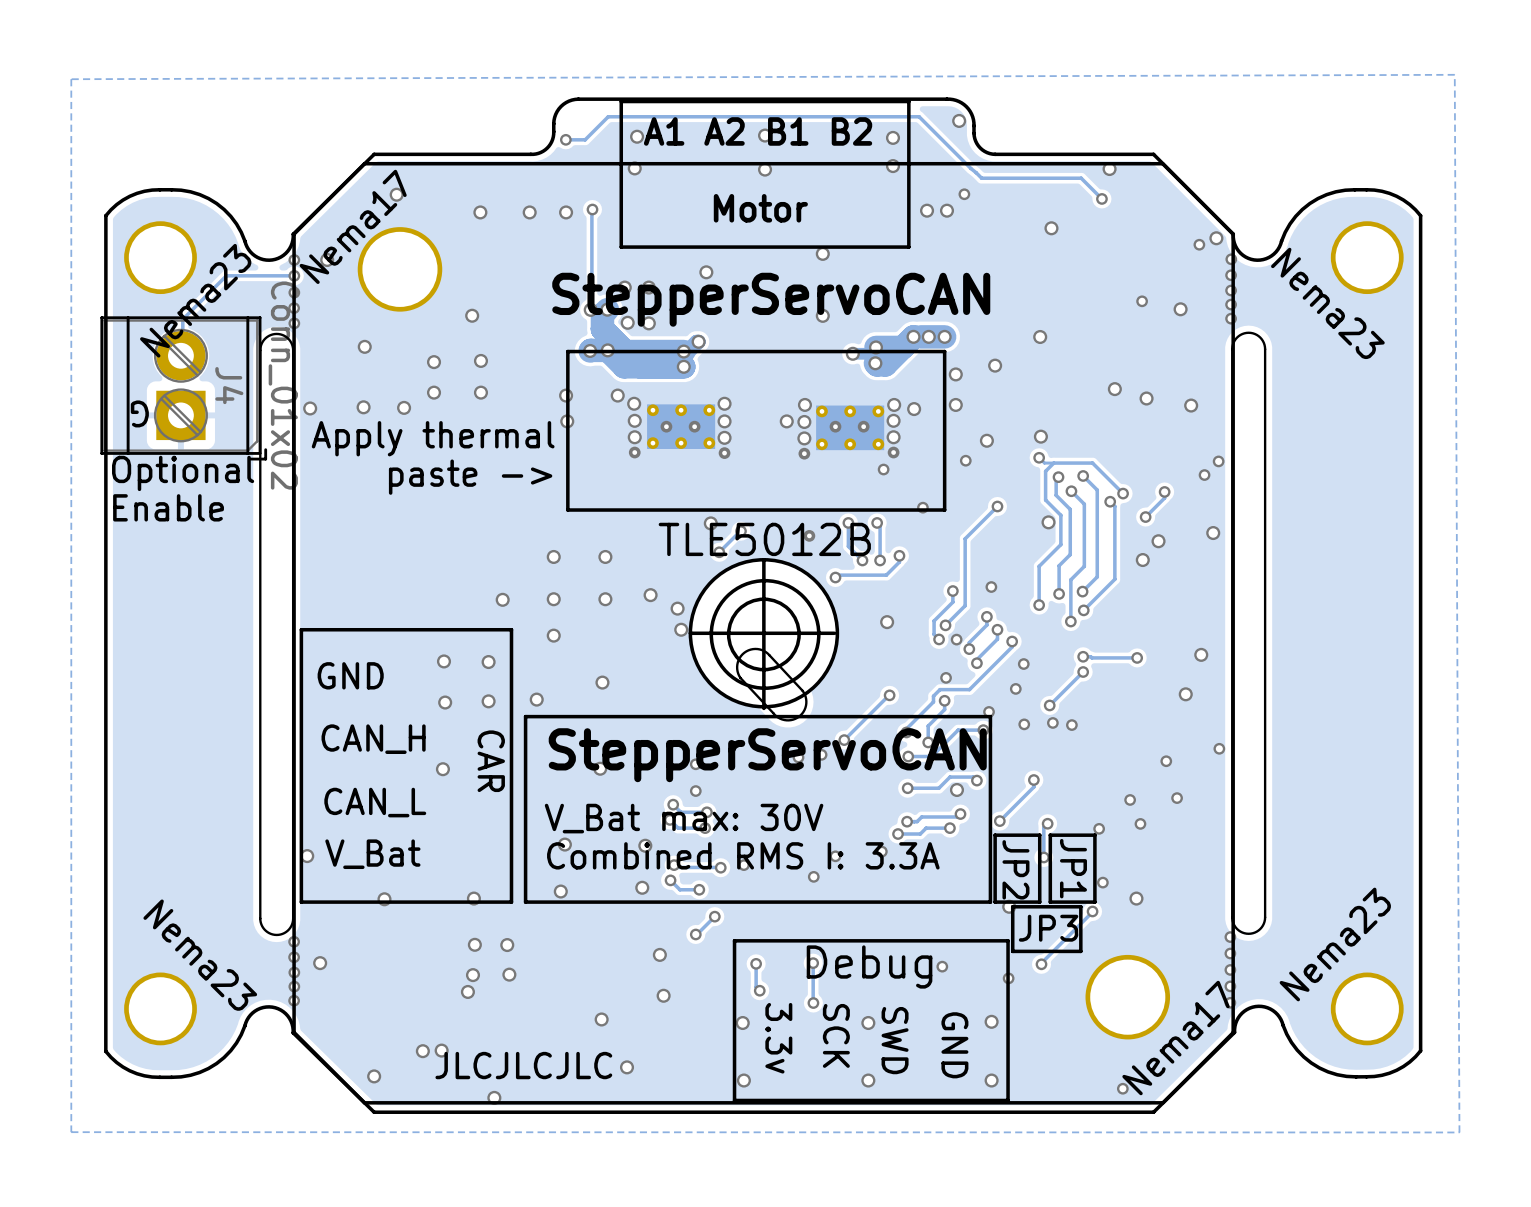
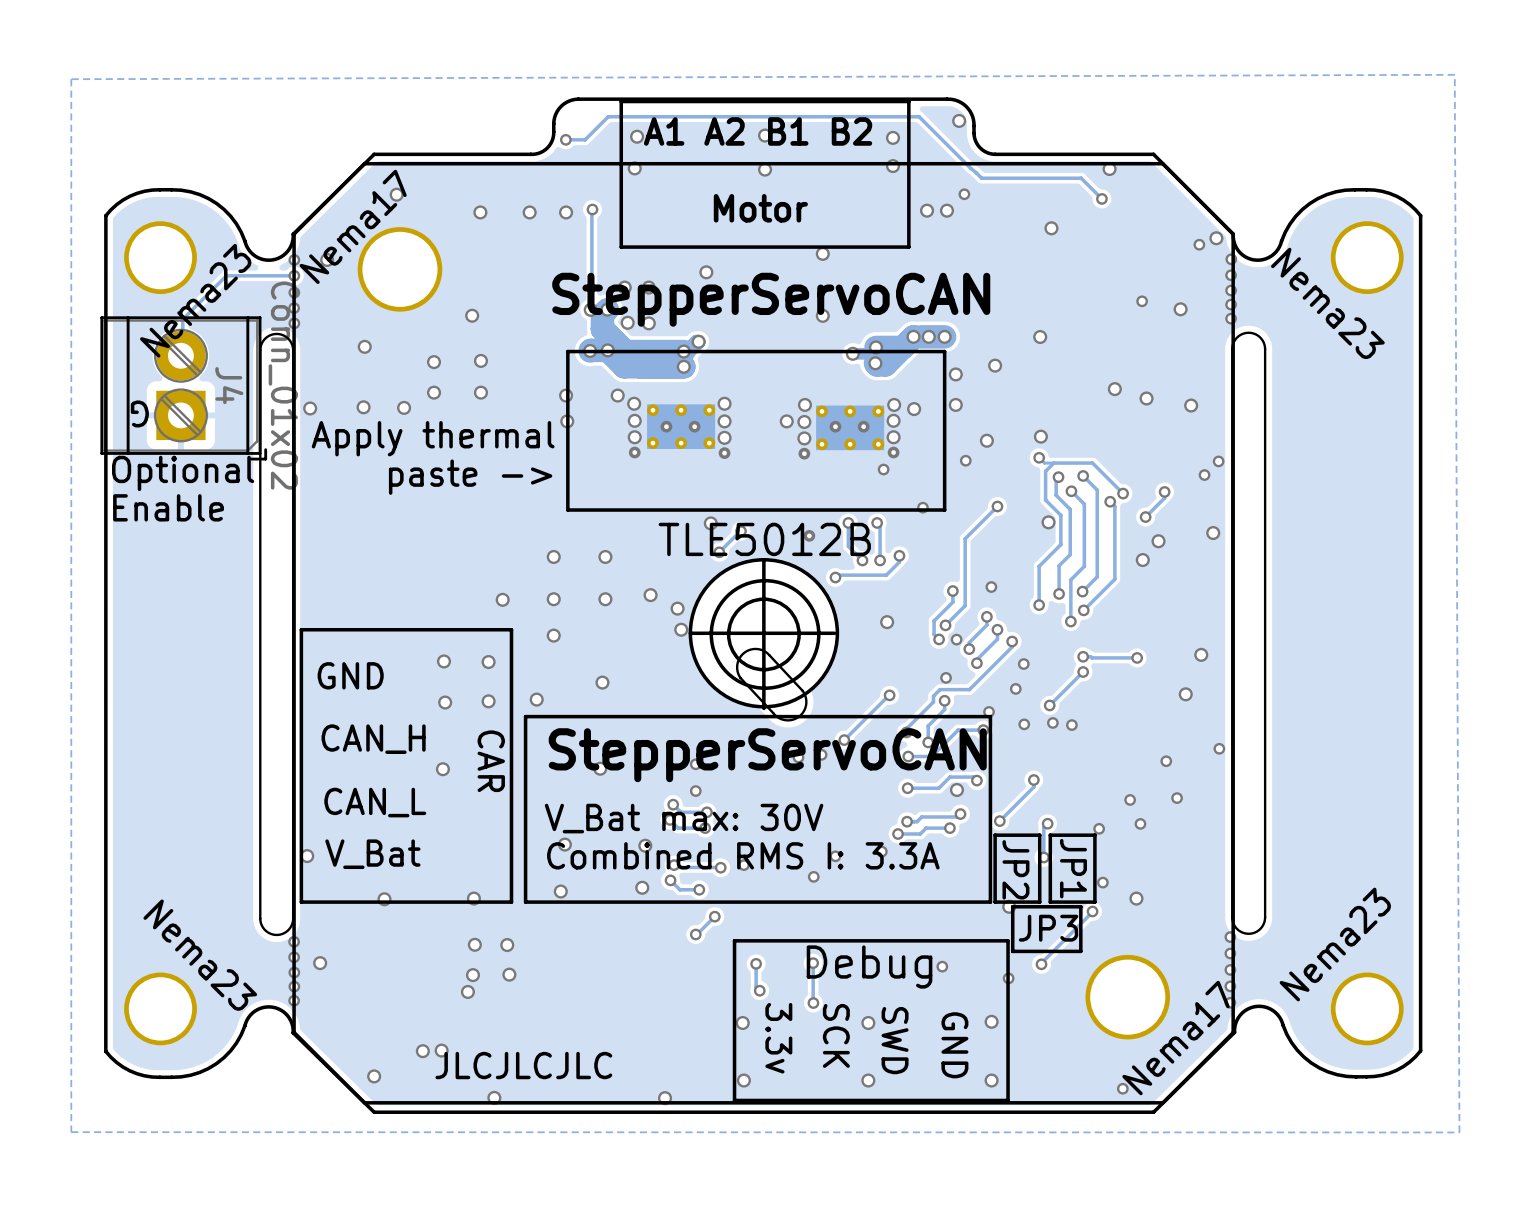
via: (659, 954) -> none
via: (663, 995) -> none
via: (601, 1019) -> none
via position: (627, 1067) -> (665, 1098)

